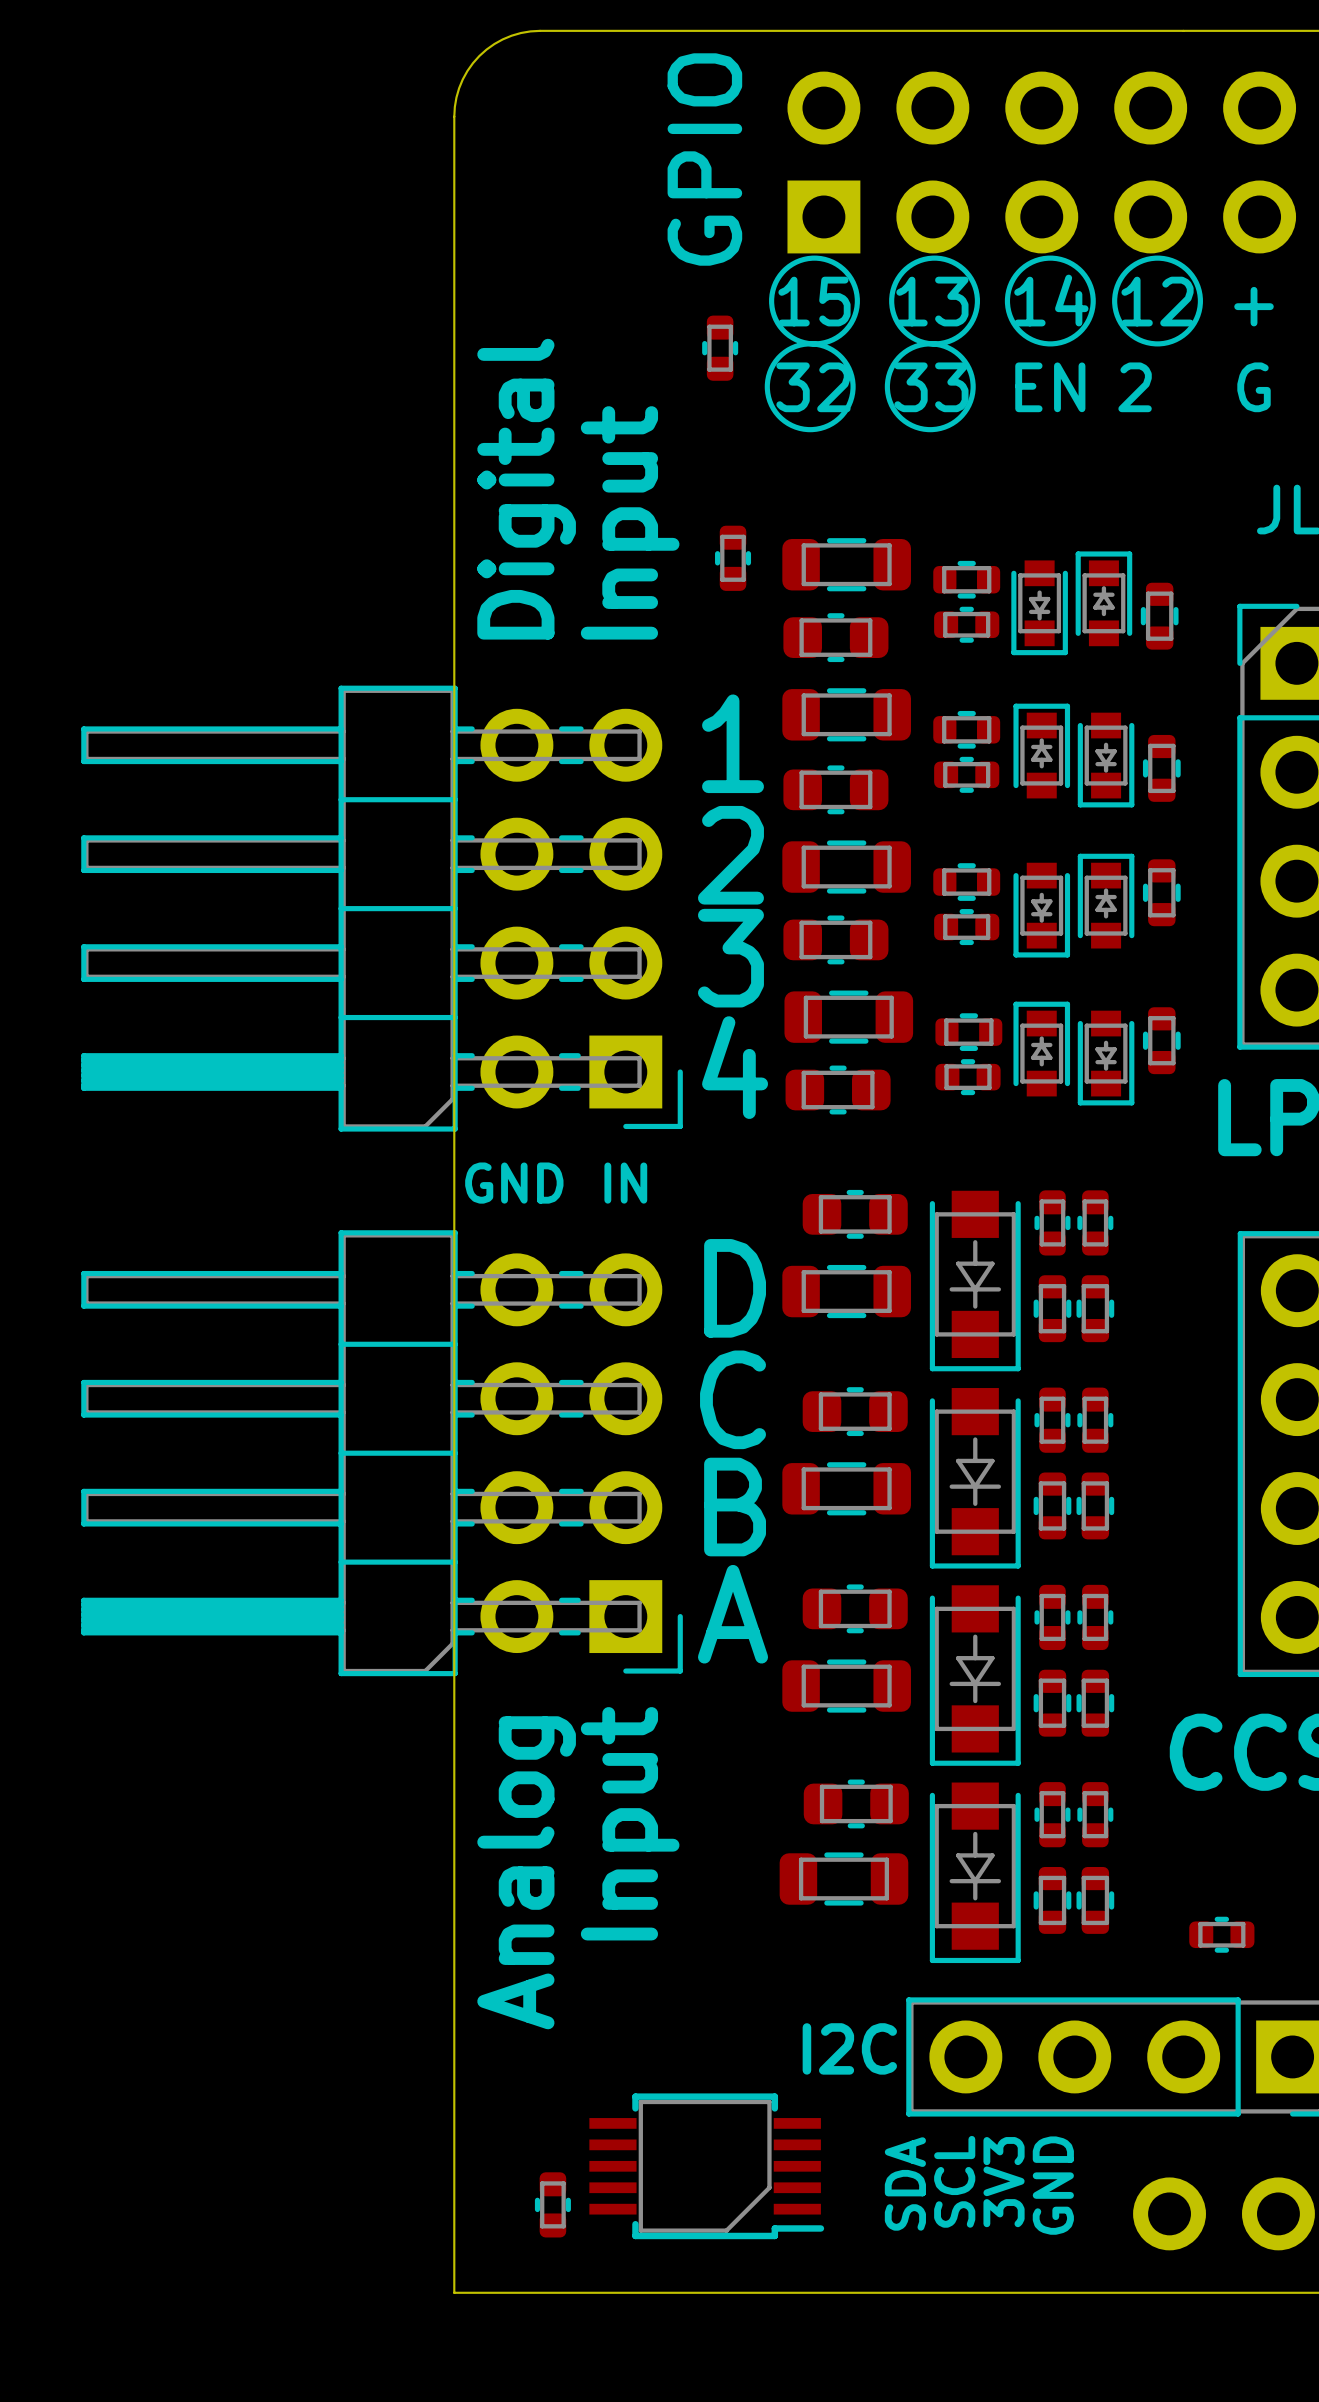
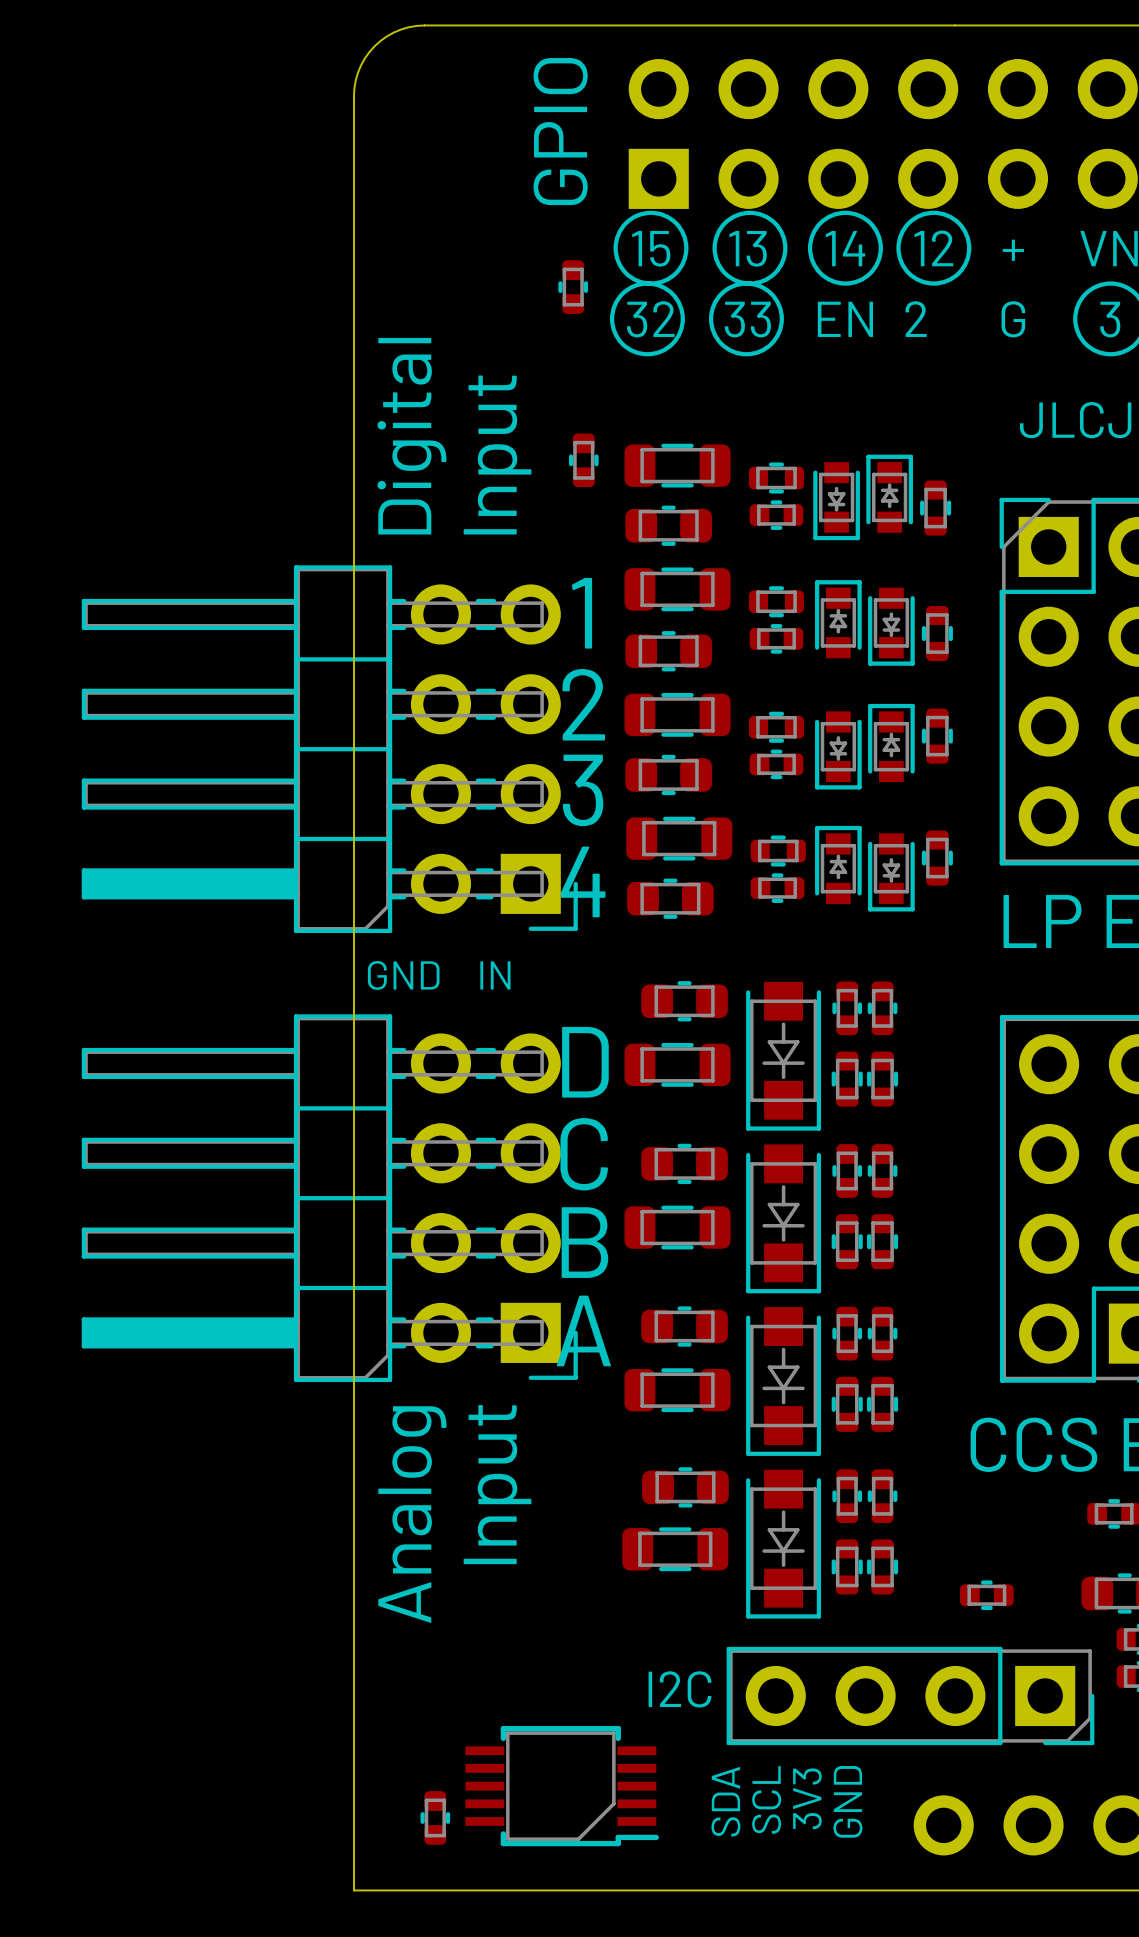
part position: (382, 908) -> (329, 749)
part position: (382, 1453) -> (329, 1198)

